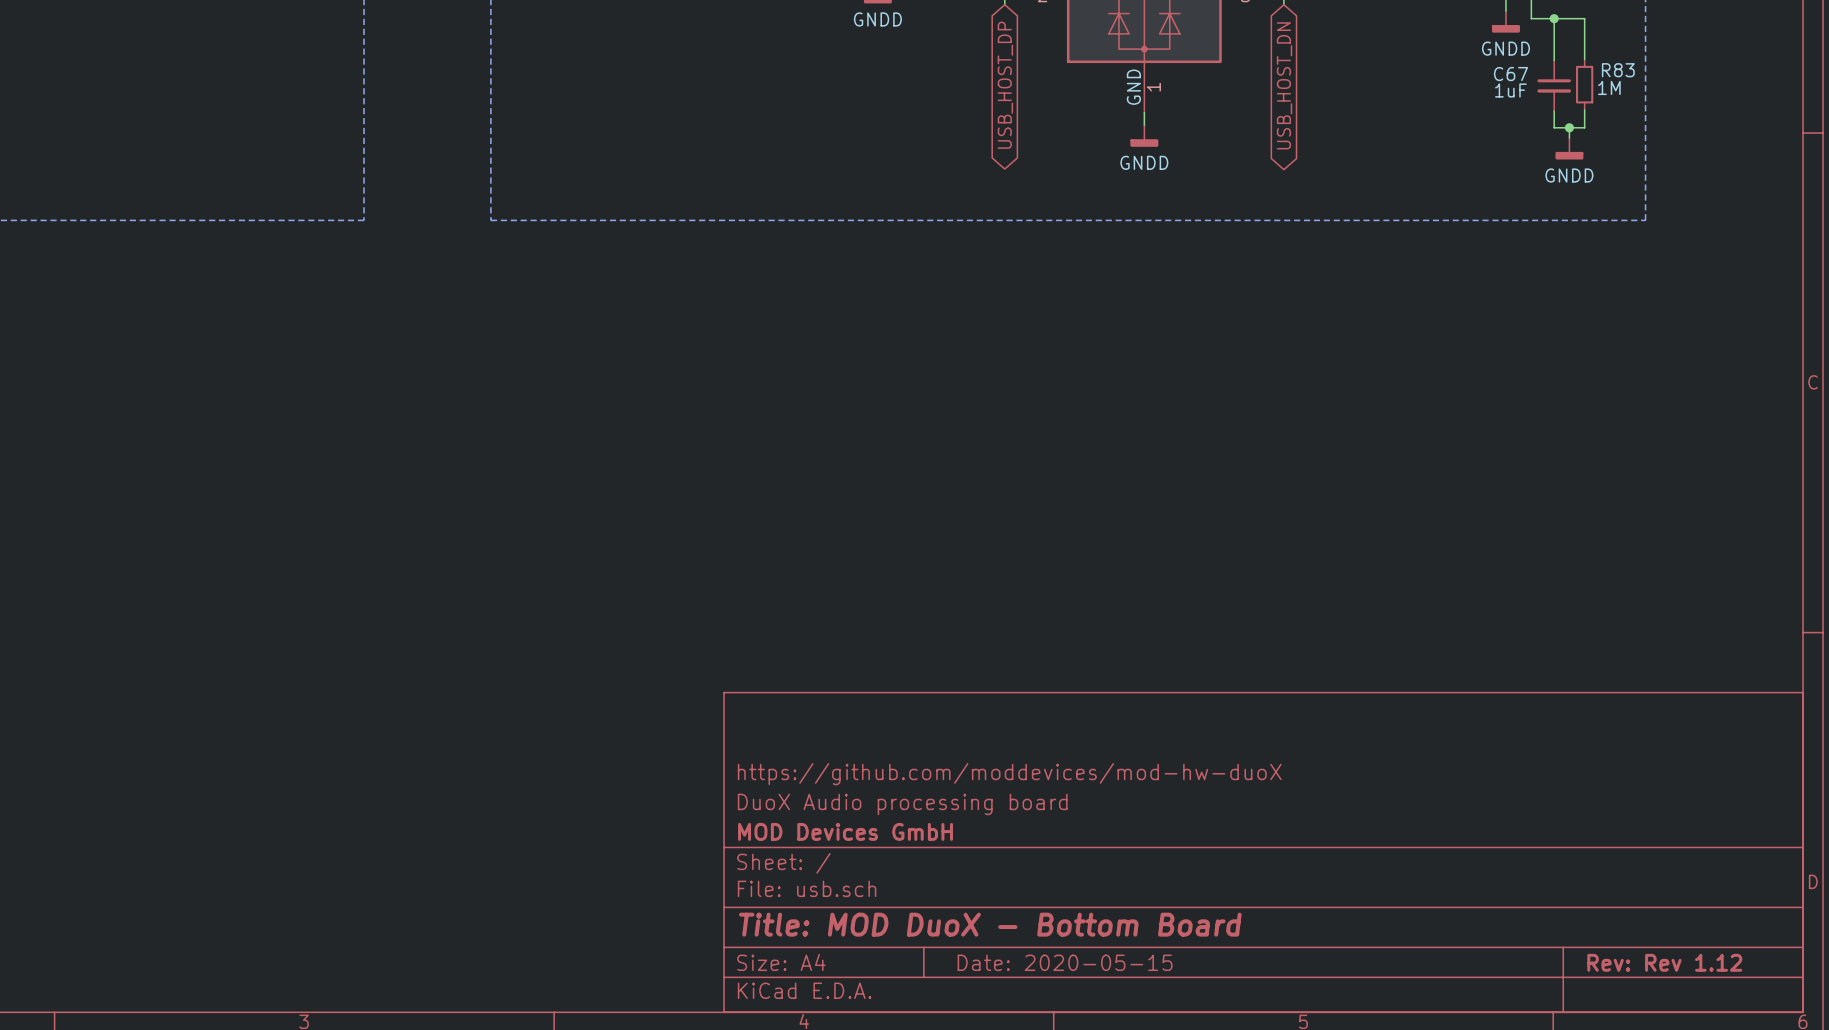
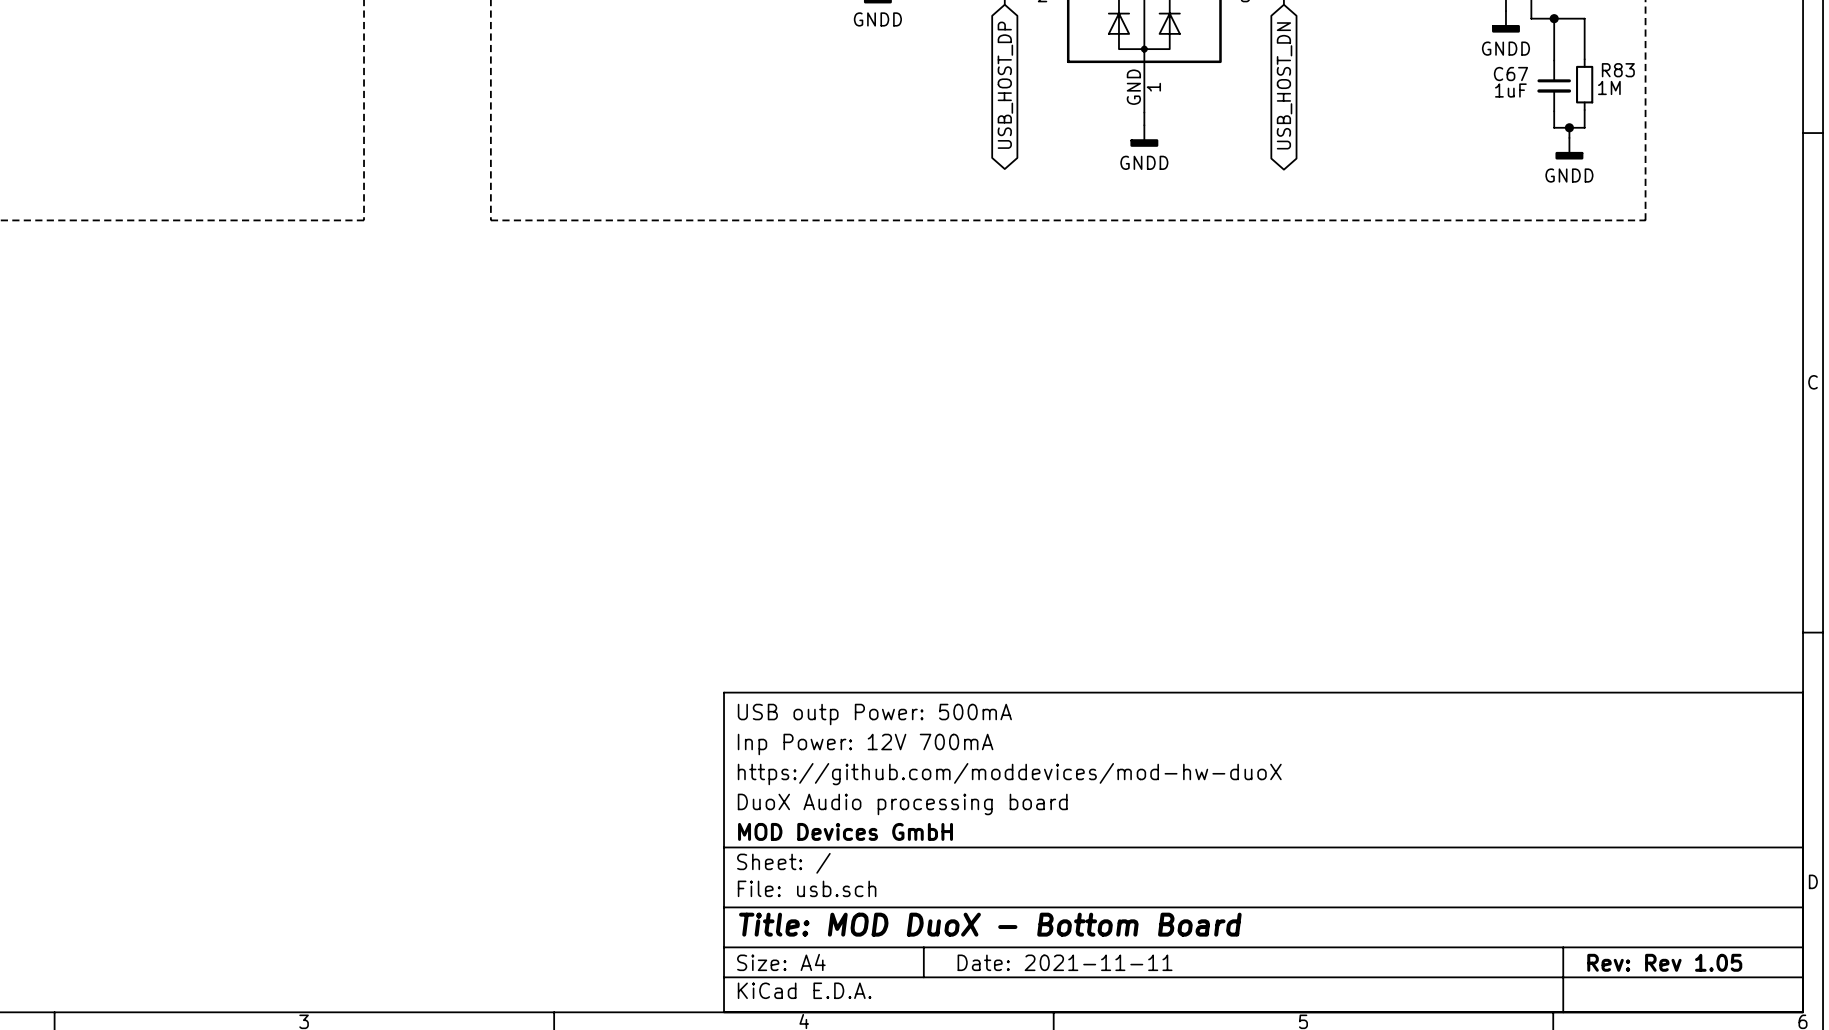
title block: none -> USB outp Power: 500mA (874, 714)
title block: none -> Inp Power: 12V 700mA (865, 744)
title block: Date: 2020-05-15 (1065, 962) -> Date: 2021-11-11 (1065, 962)
title block: Rev: Rev 1.12 (1664, 962) -> Rev: Rev 1.05 (1664, 962)

